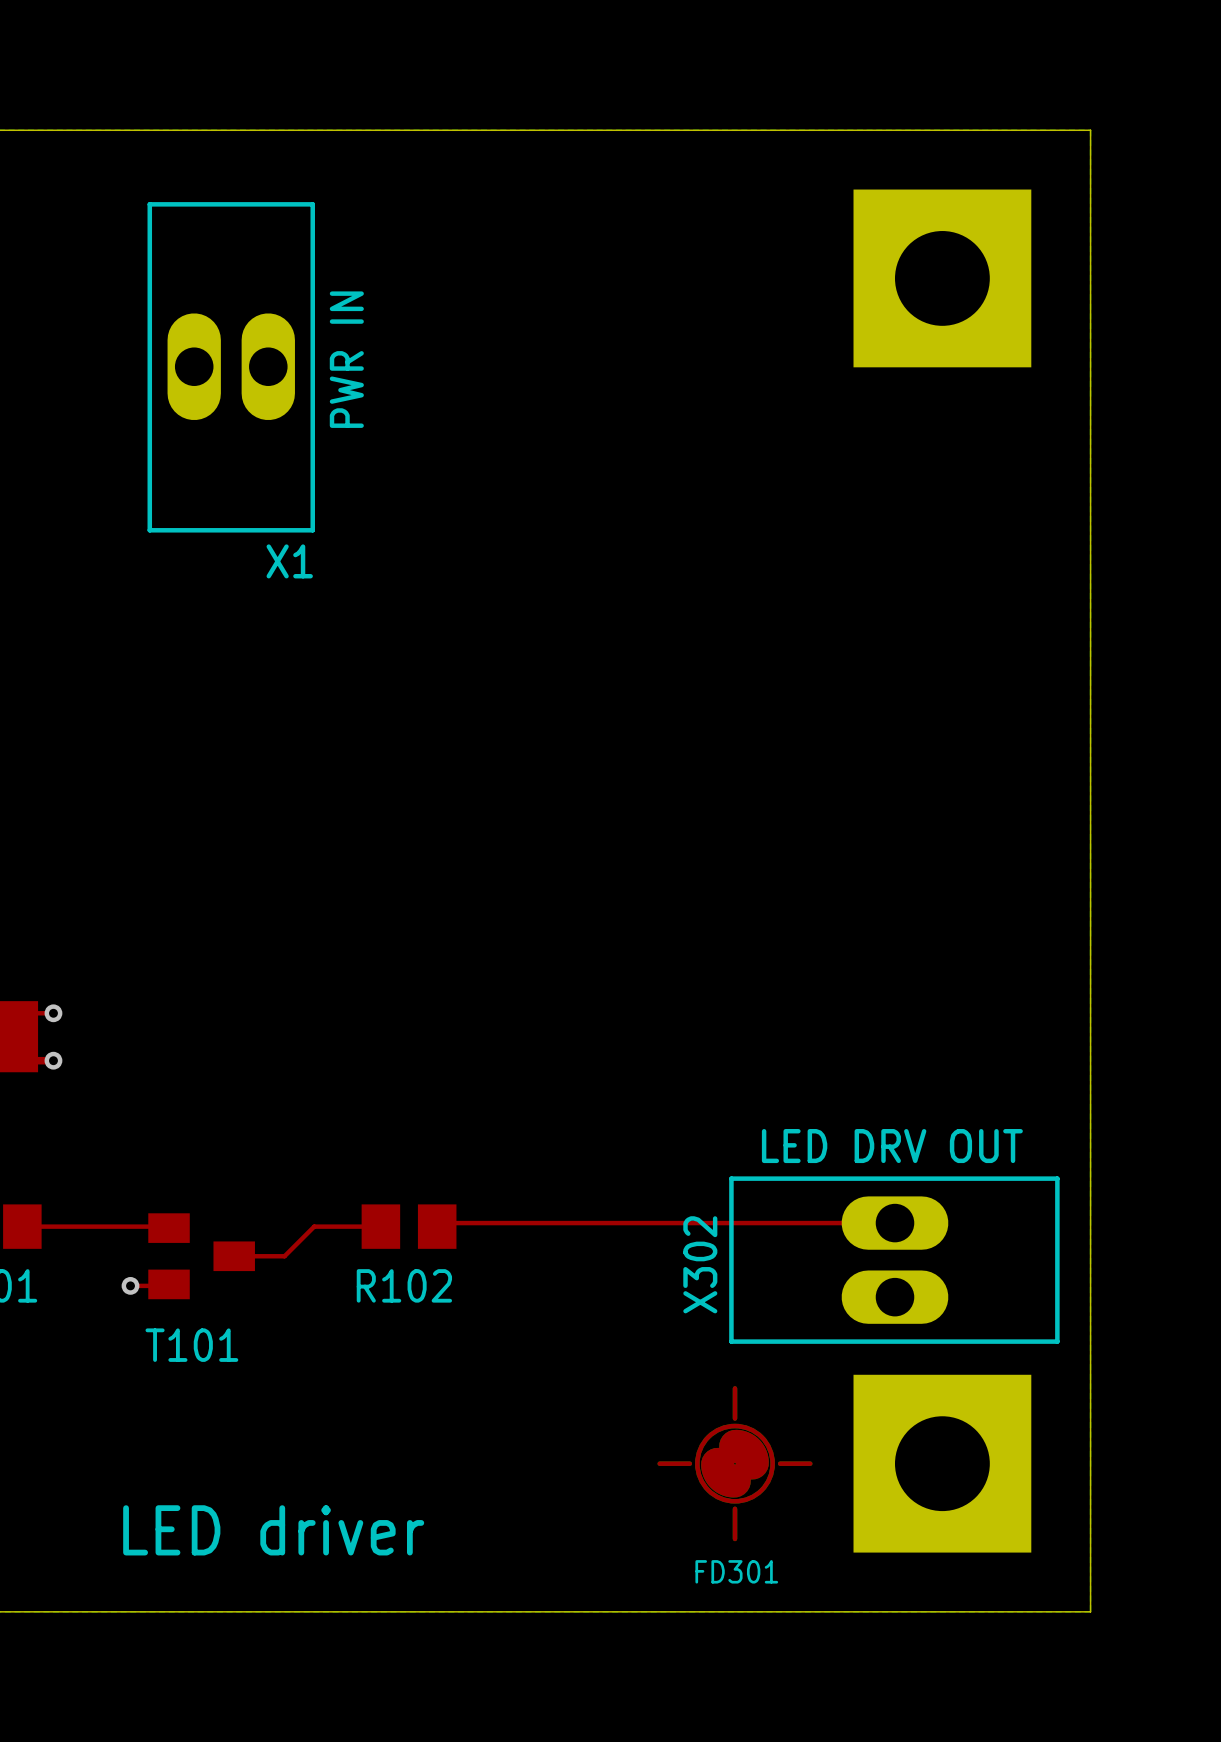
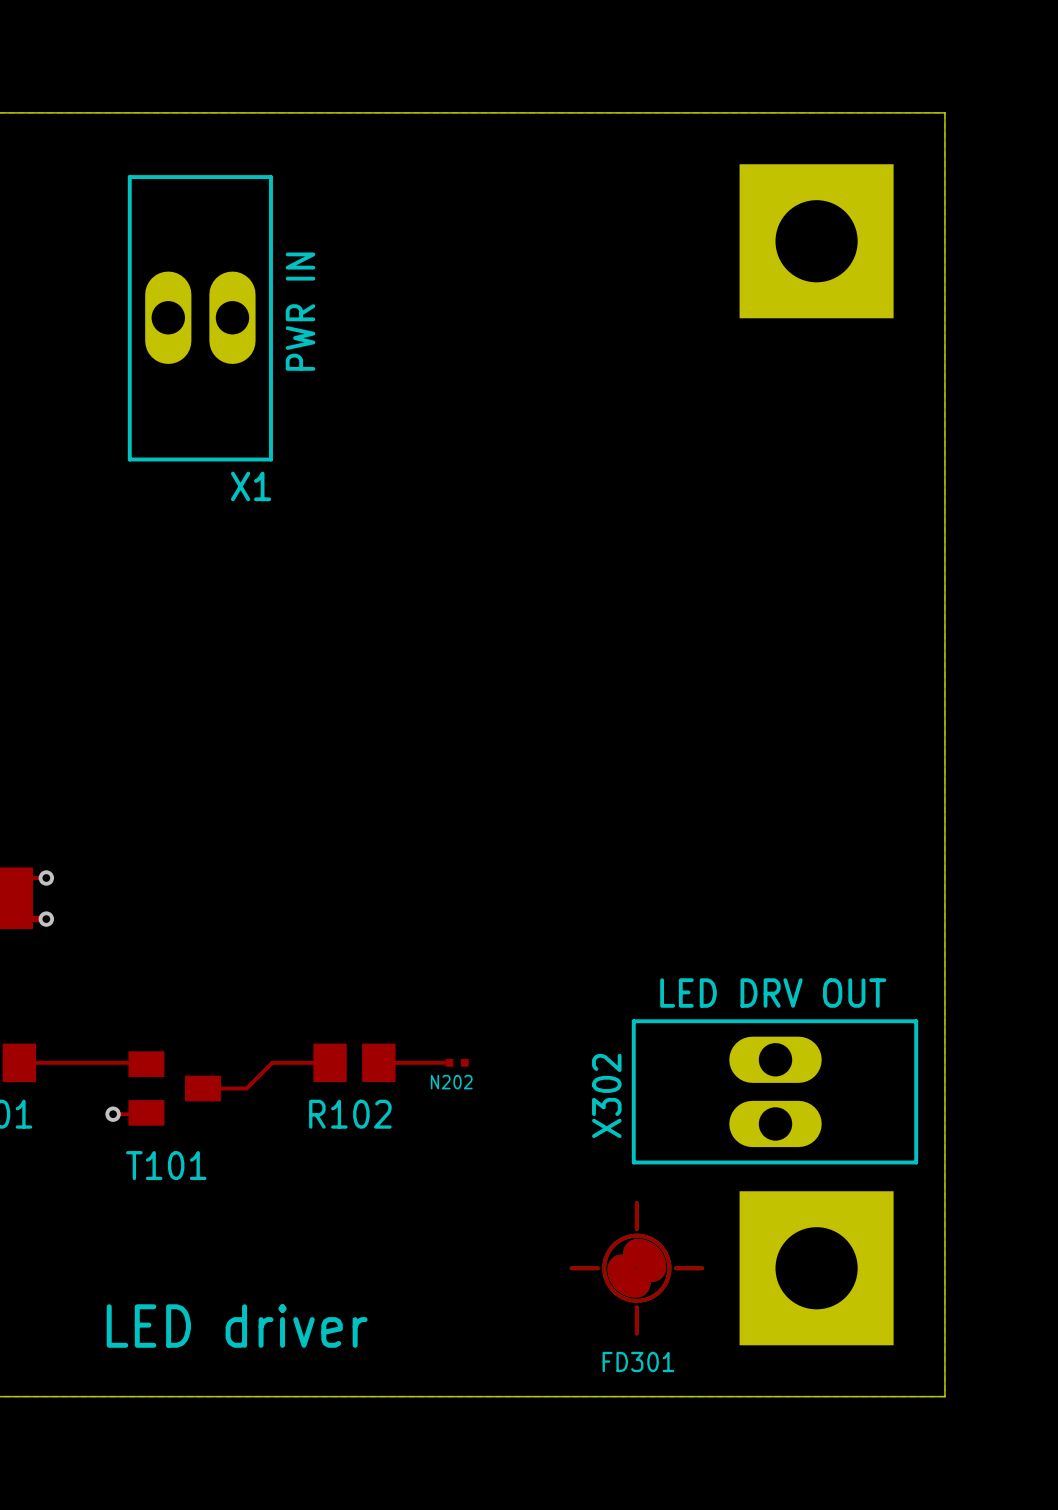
top track: (895, 1223) (437, 1223) (437, 1226) -> (449, 1062) (378, 1062)
N202: none -> (457, 1062)

